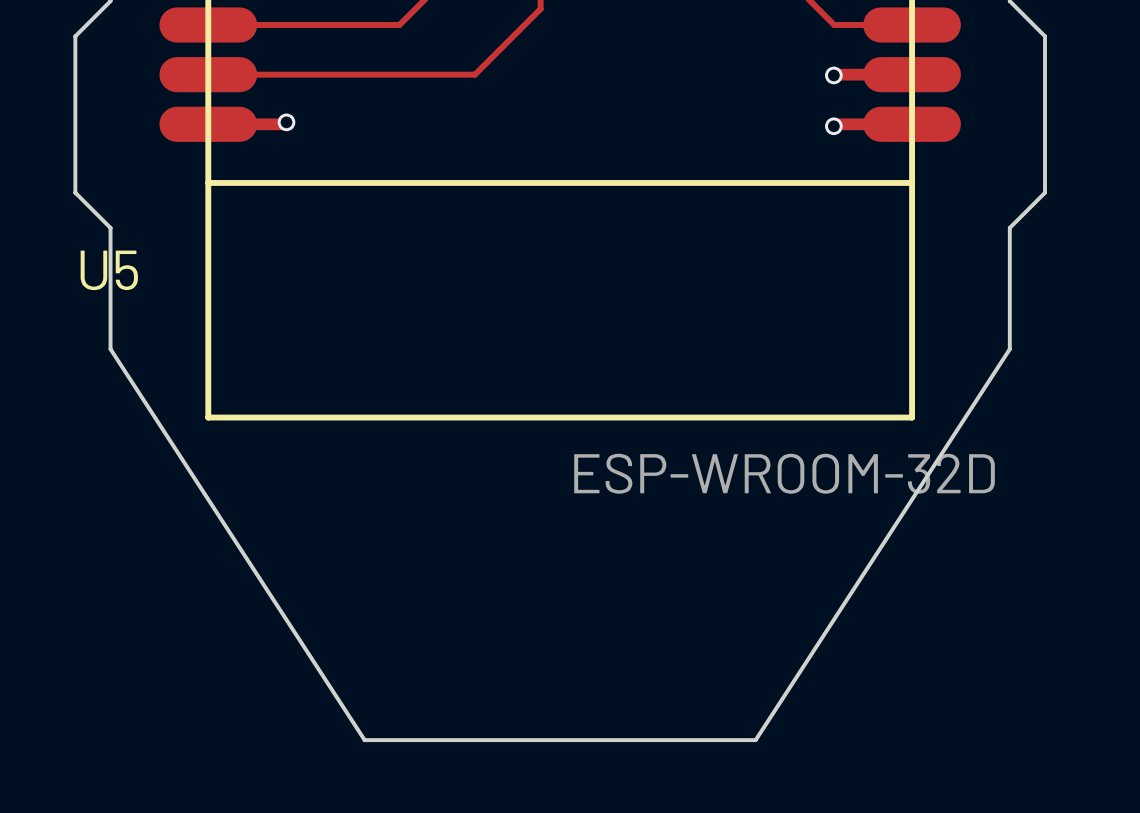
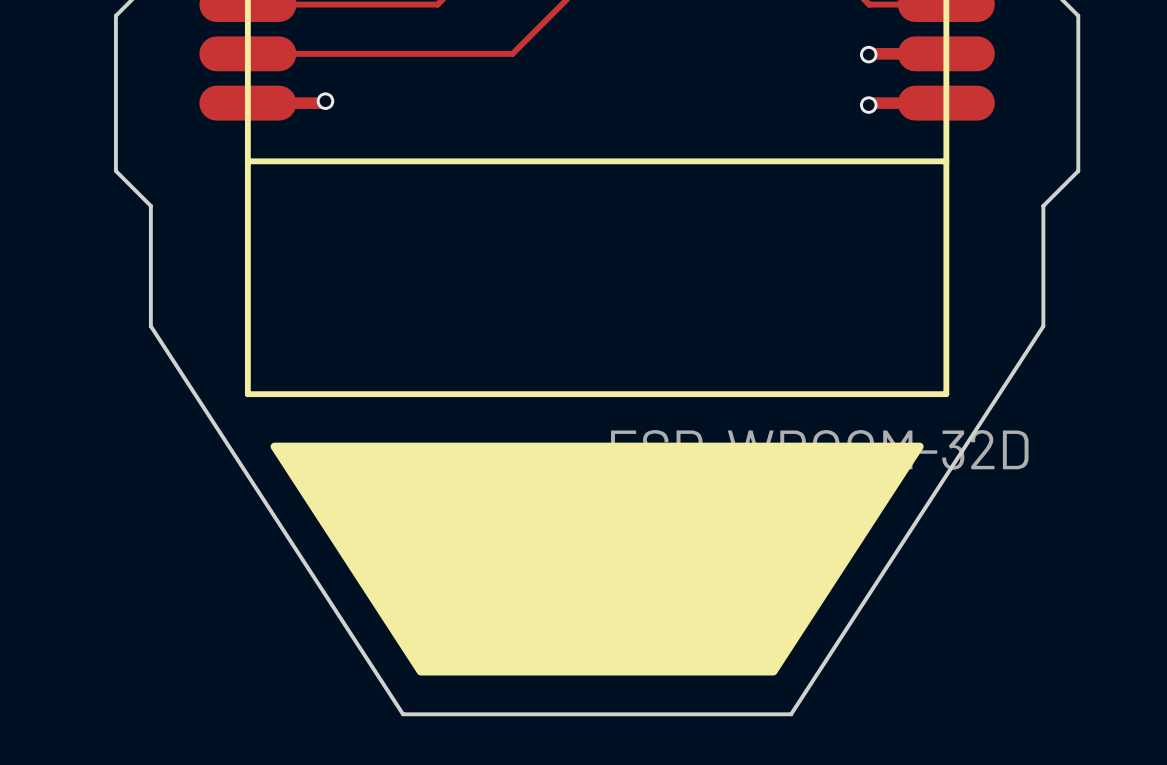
U5 name: U5 (109, 270) -> none
drawing: none -> [270, 442, 924, 676]

